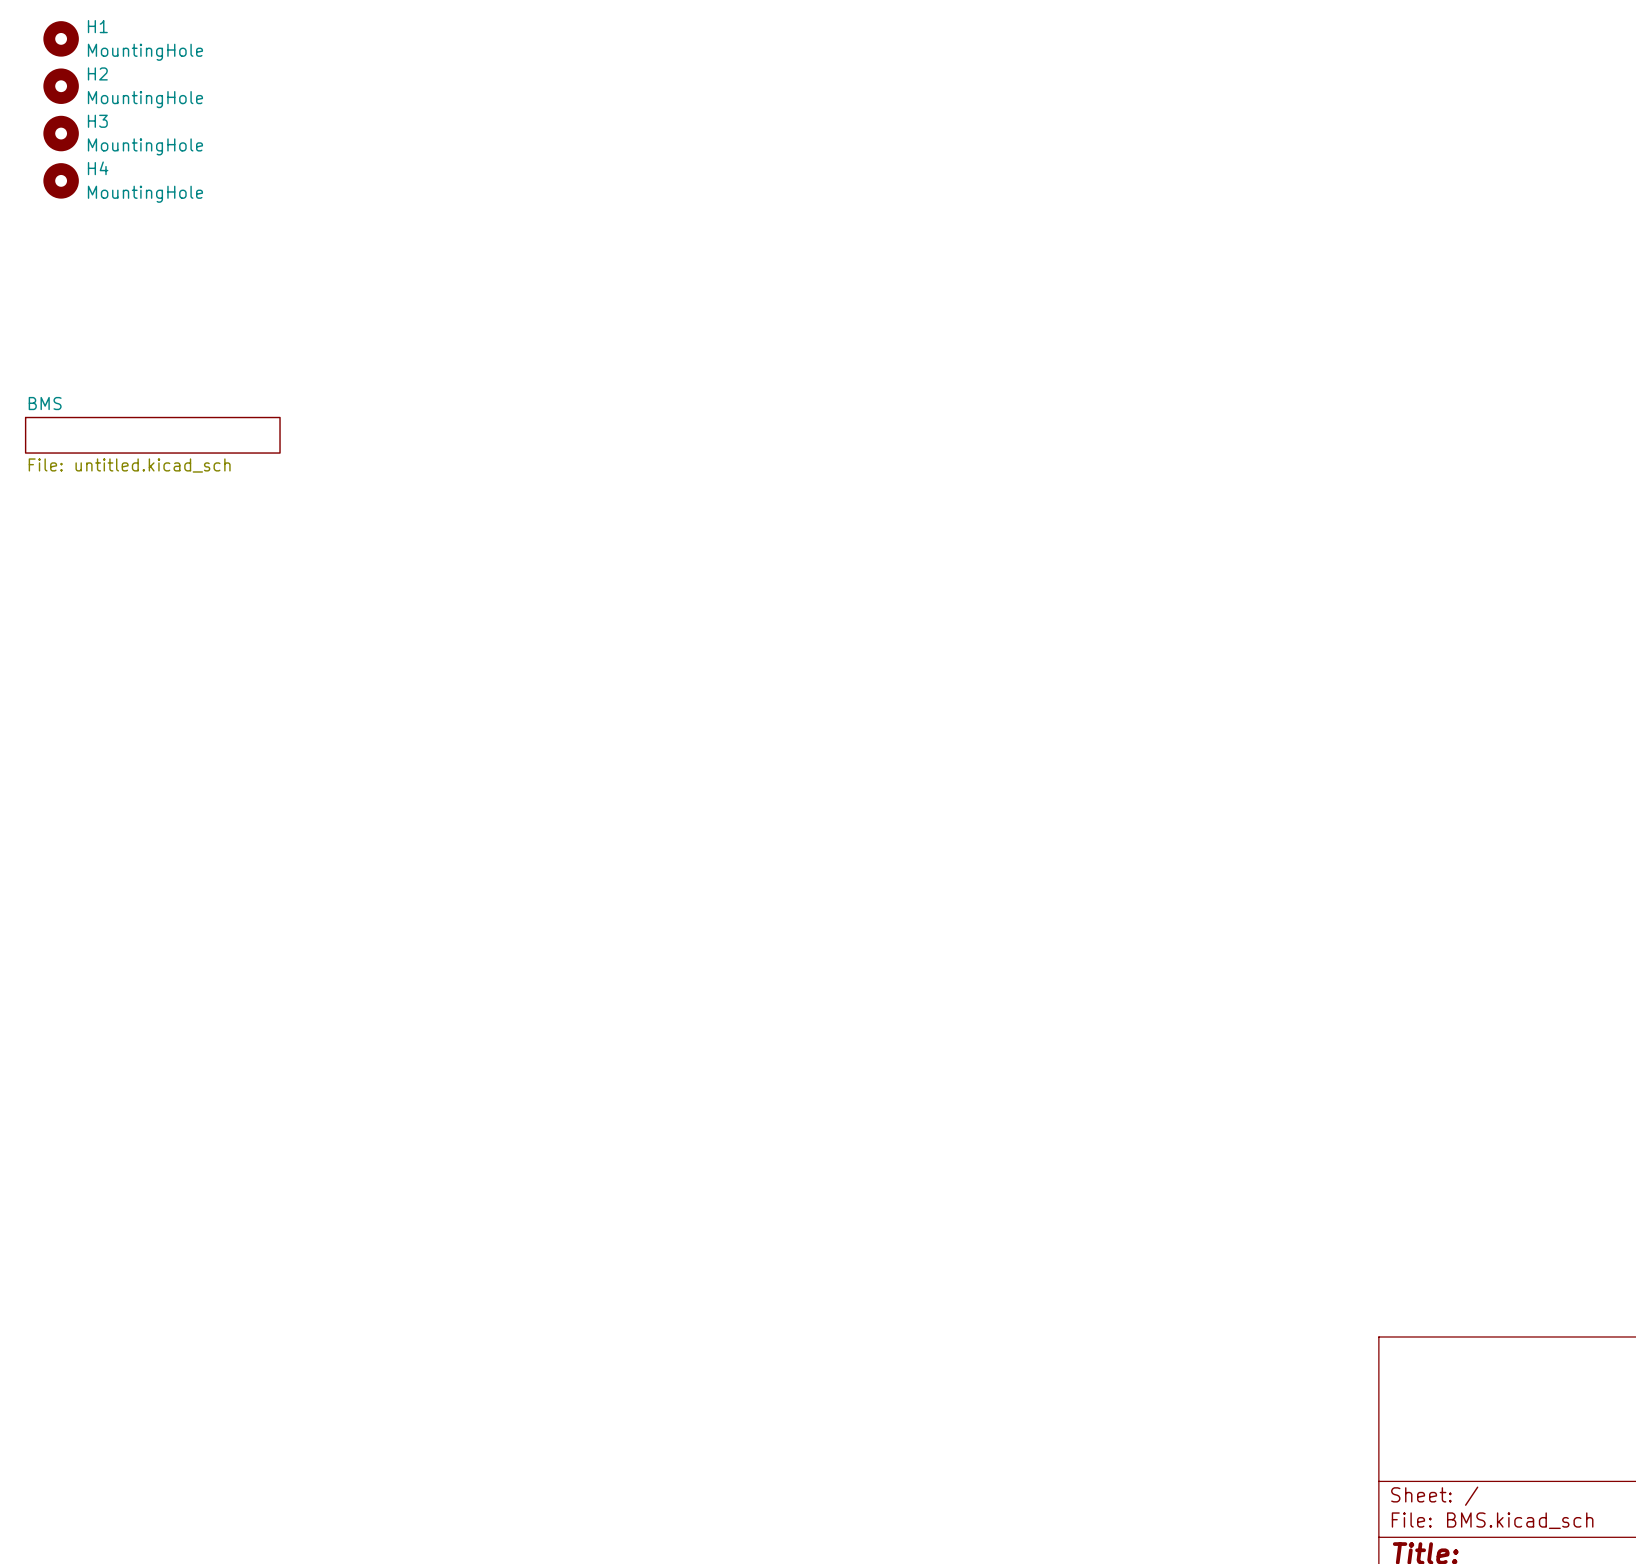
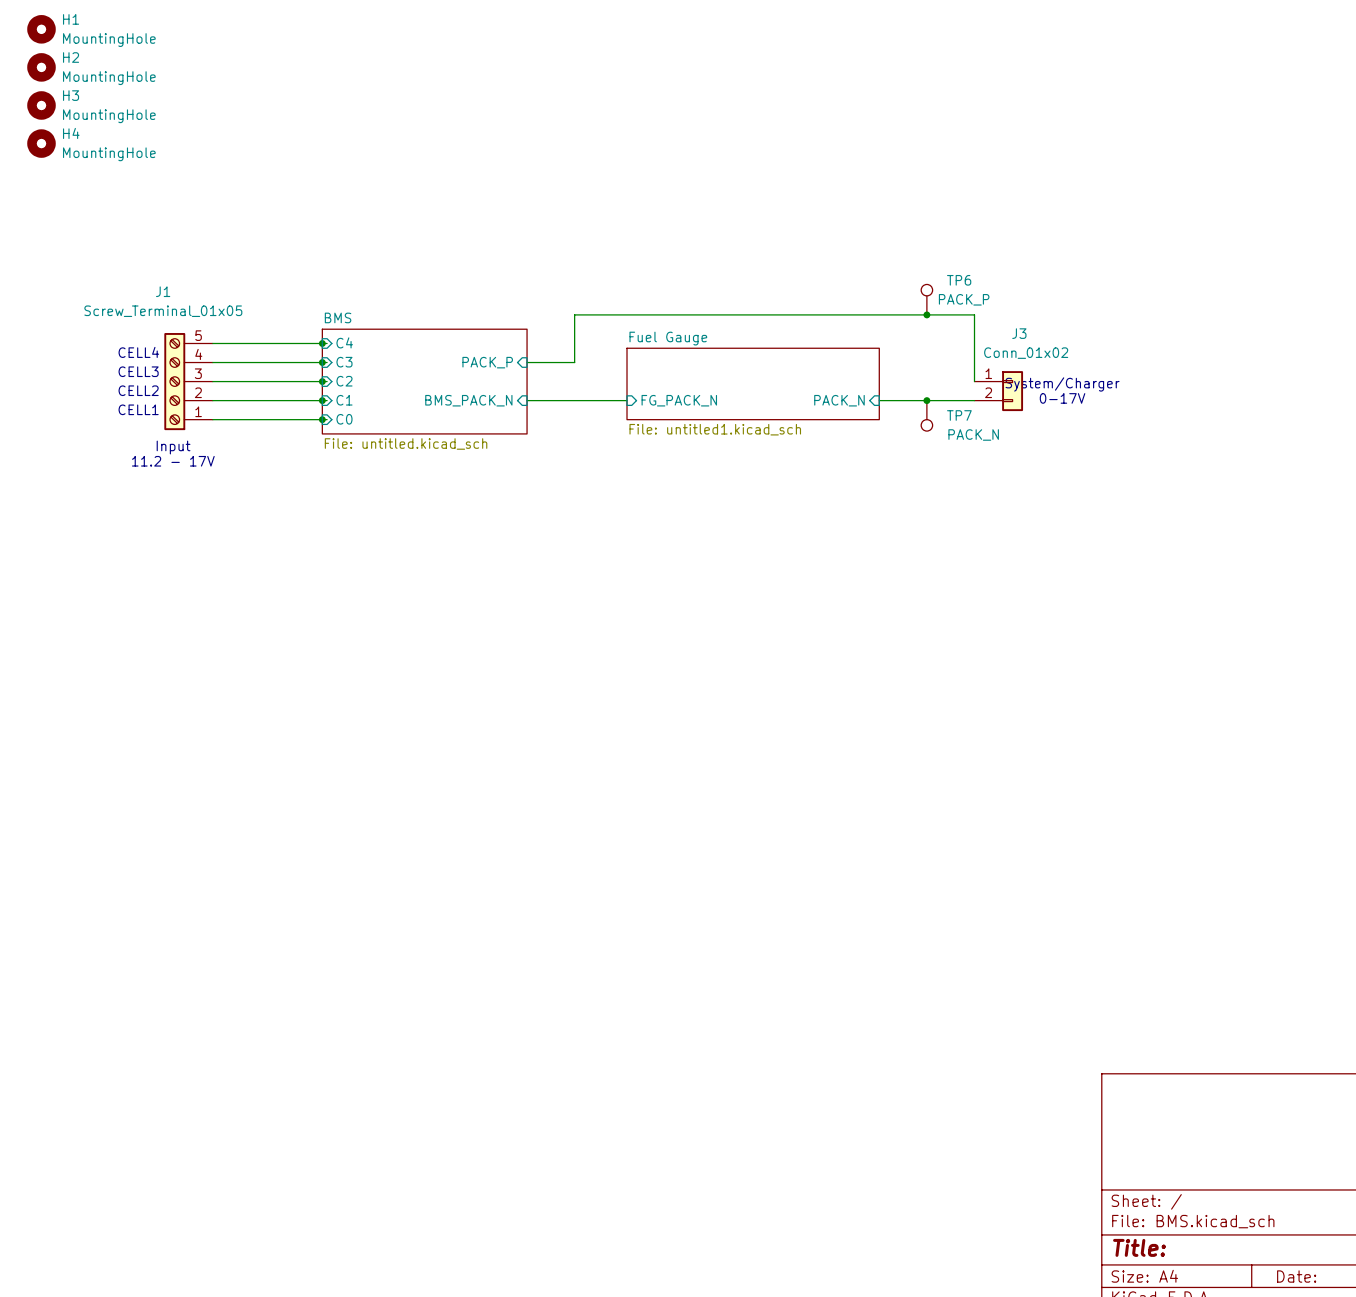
TP6: none -> PACK_P (926, 299)
junction: none -> (926, 314)
sheet pin: none -> C4 (344, 342)
wire: none -> (212, 343) (327, 343)
junction: none -> (322, 343)
sheet BMS: File: untitled.kicad_sch (152, 435) -> none
text: none -> CELL4 (138, 352)
sheet pin: none -> C3 (344, 362)
wire: none -> (212, 362) (327, 362)
junction: none -> (322, 362)
sheet pin: none -> PACK_P (487, 362)
wire: none -> (527, 362) (574, 362) (574, 314) (974, 314) (974, 381)
text: none -> CELL3 (138, 371)
J1: none -> Screw_Terminal_01x05 (188, 381)
wire: none -> (212, 381) (327, 381)
junction: none -> (322, 381)
sheet pin: none -> C2 (344, 381)
sheet BMS: none -> File: untitled.kicad_sch (424, 381)
sheet Fuel Gauge: none -> File: untitled1.kicad_sch (753, 383)
text: none -> System/Charger (1062, 384)
text: none -> CELL2 (138, 390)
J3: none -> Conn_01x02 (998, 391)
text: none -> 0-17V (1062, 398)
sheet pin: none -> C1 (344, 400)
wire: none -> (212, 400) (327, 400)
junction: none -> (322, 400)
sheet pin: none -> BMS_PACK_N (468, 400)
wire: none -> (527, 400) (627, 400)
sheet pin: none -> FG_PACK_N (679, 400)
sheet pin: none -> PACK_N (839, 400)
wire: none -> (879, 400) (974, 400)
junction: none -> (926, 400)
text: none -> CELL1 (138, 409)
TP7: none -> PACK_N (926, 415)
sheet pin: none -> C0 (344, 419)
wire: none -> (212, 419) (327, 419)
junction: none -> (322, 419)
text: none -> Input (173, 447)
text: none -> 11.2 - 17V (173, 461)

